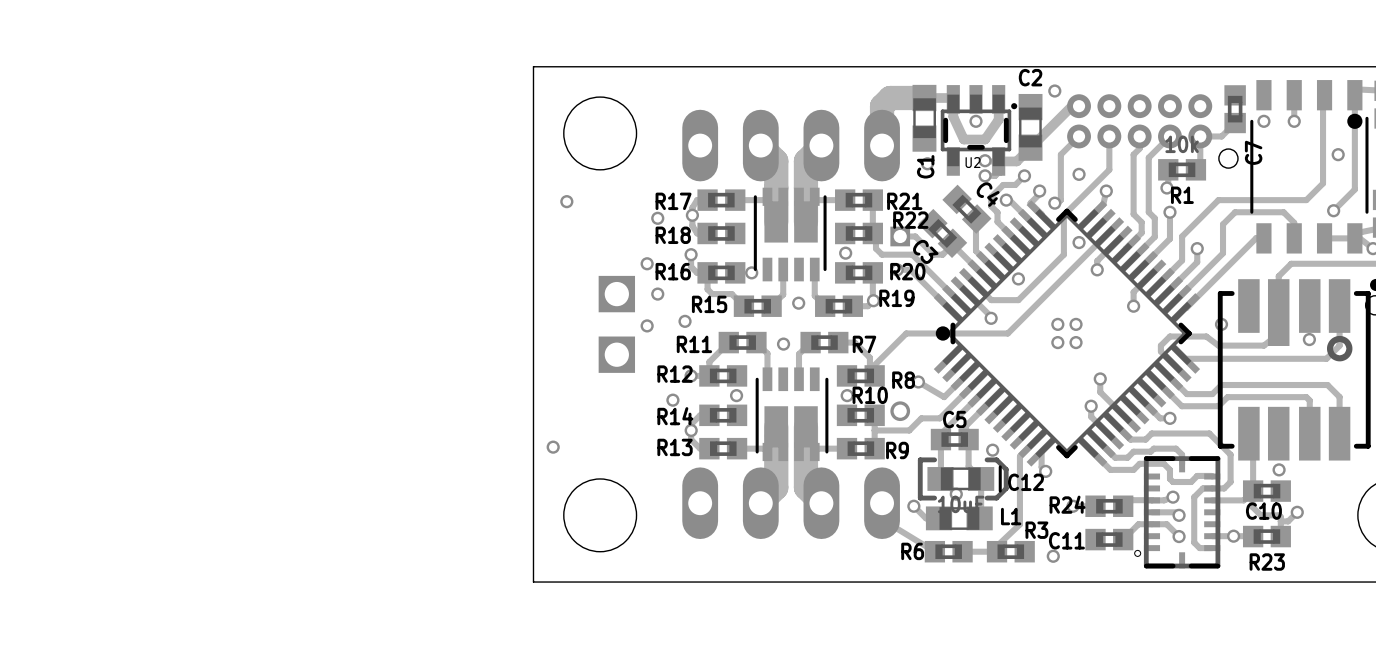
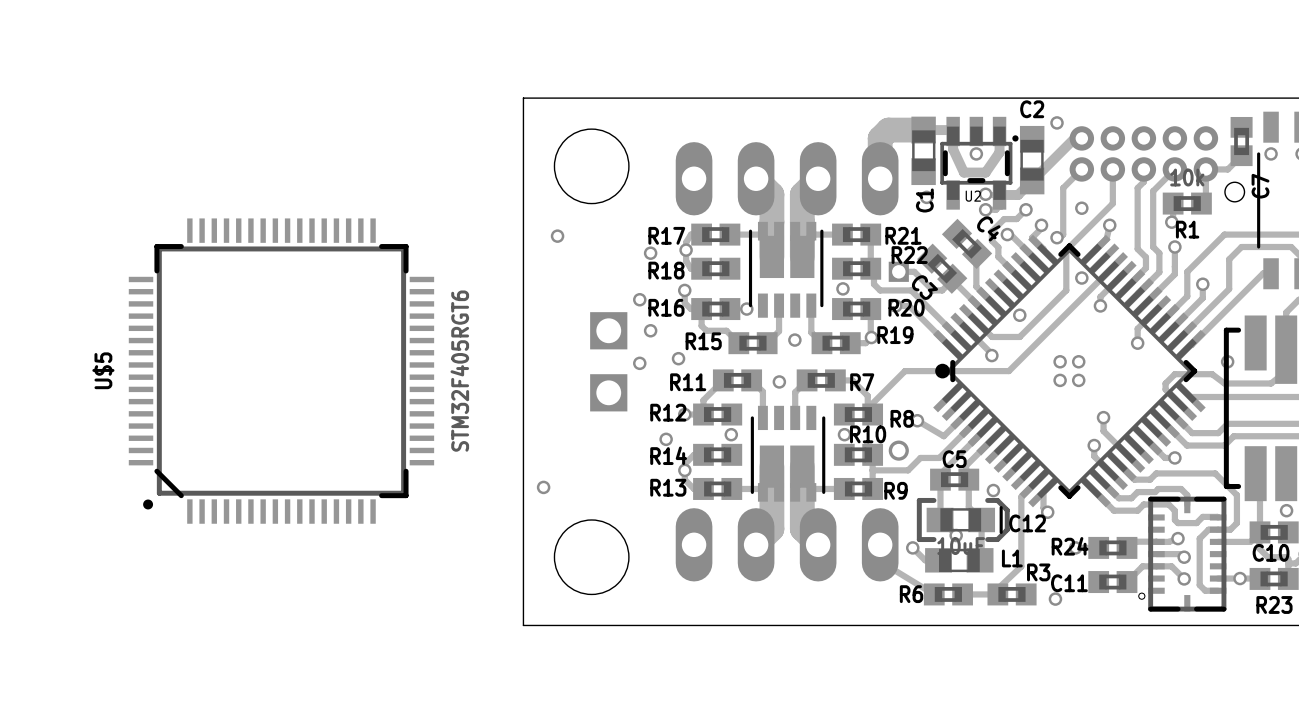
U$5: none -> STM32F405RGT6 (281, 371)

